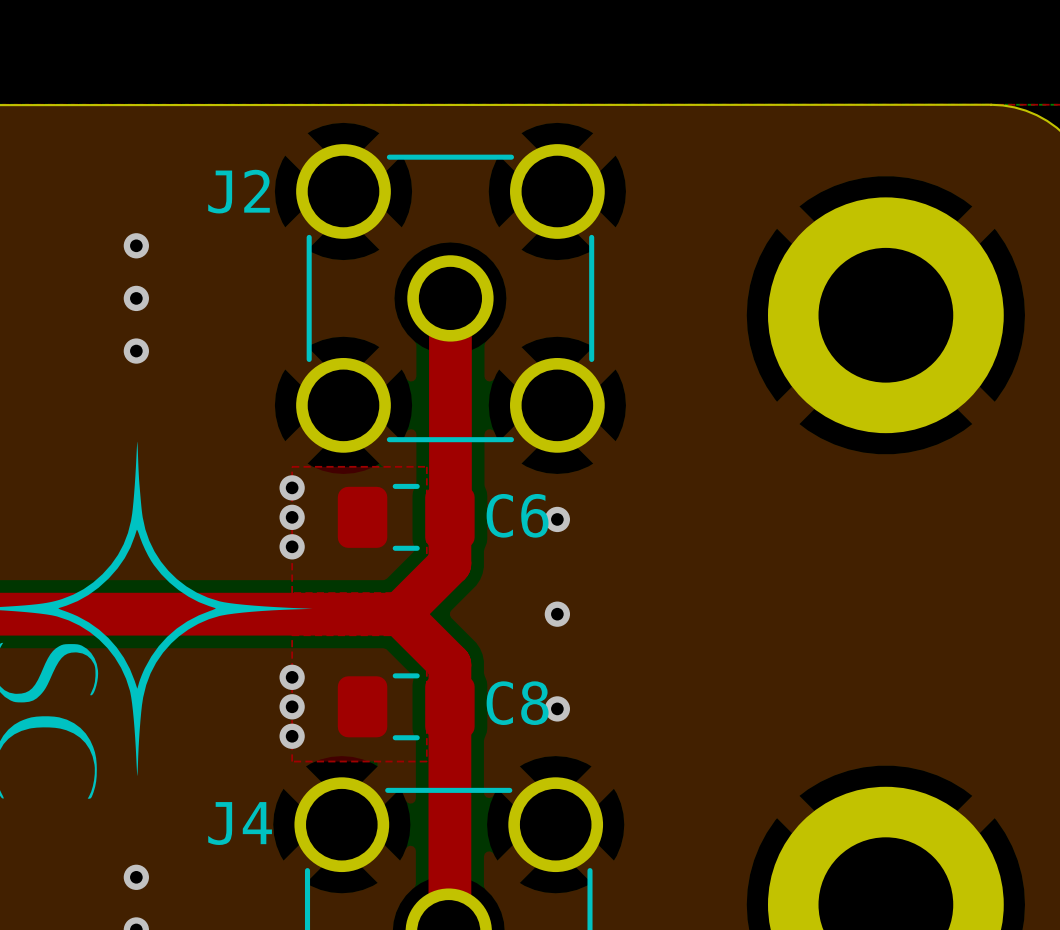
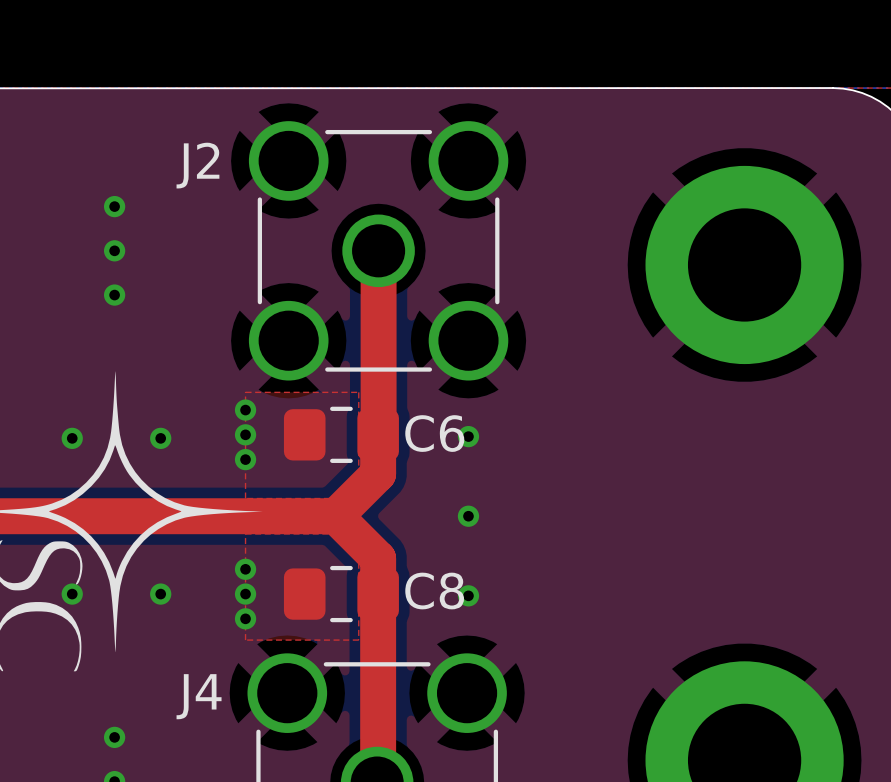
via: none -> (72, 438)
via: none -> (160, 438)
via: none -> (72, 594)
via: none -> (160, 594)

